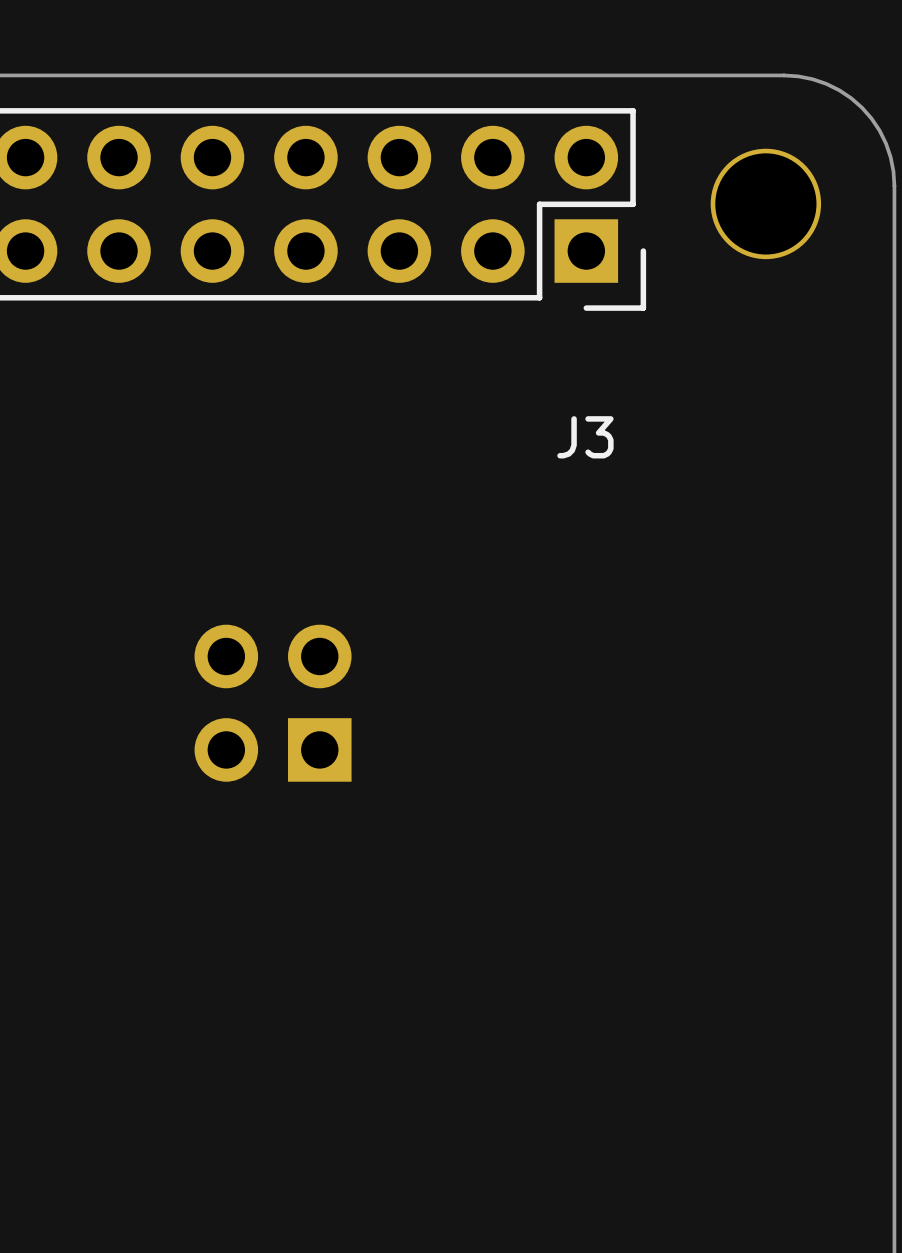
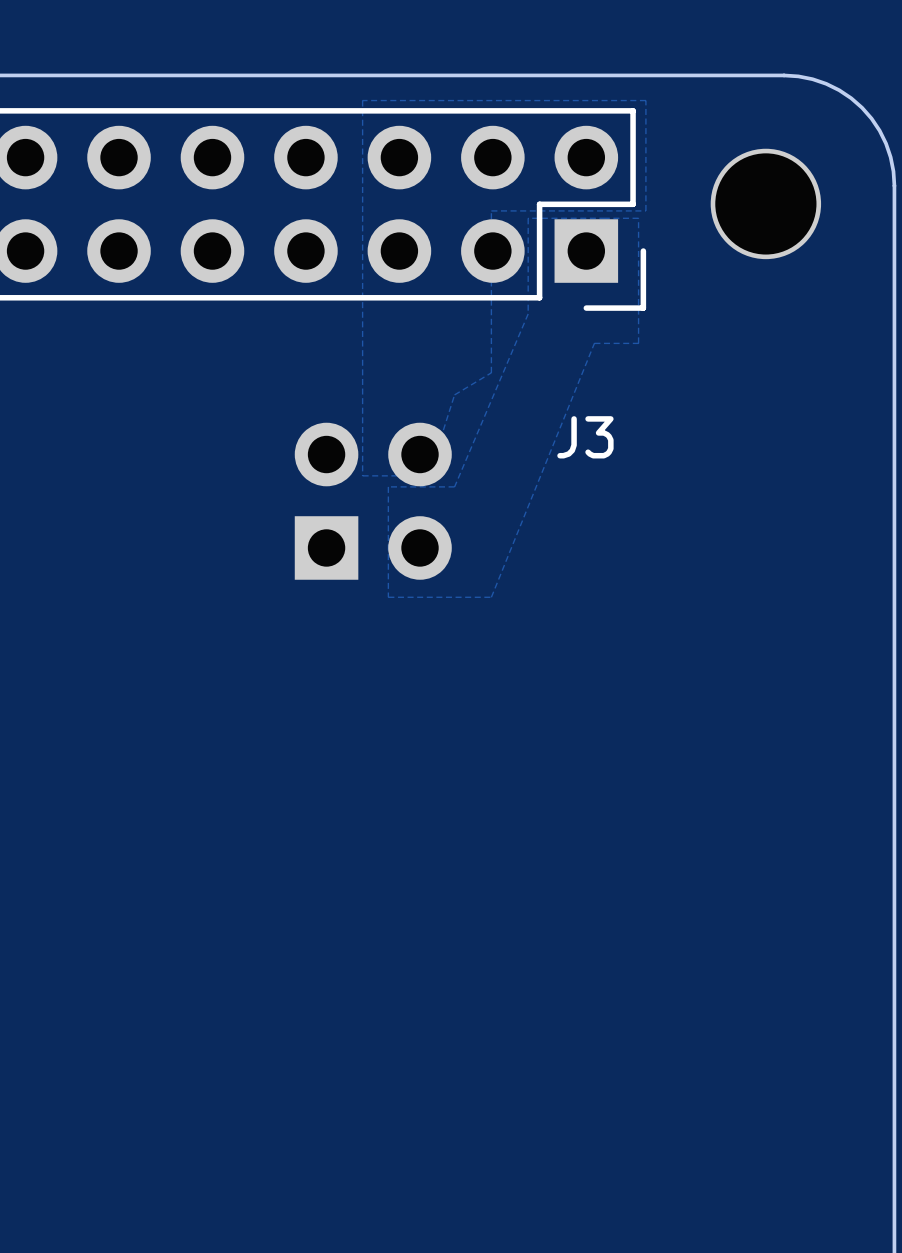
zone outline: none -> (645, 100) (645, 210) (491, 210) (491, 372) (454, 394) (428, 475) (362, 475) (362, 100) (645, 100)
zone outline: none -> (638, 218) (638, 343) (594, 343) (491, 597) (388, 597) (388, 486) (454, 486) (528, 313) (528, 218) (638, 218)
part rotation: 0° (273, 703) -> 90° clockwise (373, 501)
part position: (273, 703) -> (373, 501)

